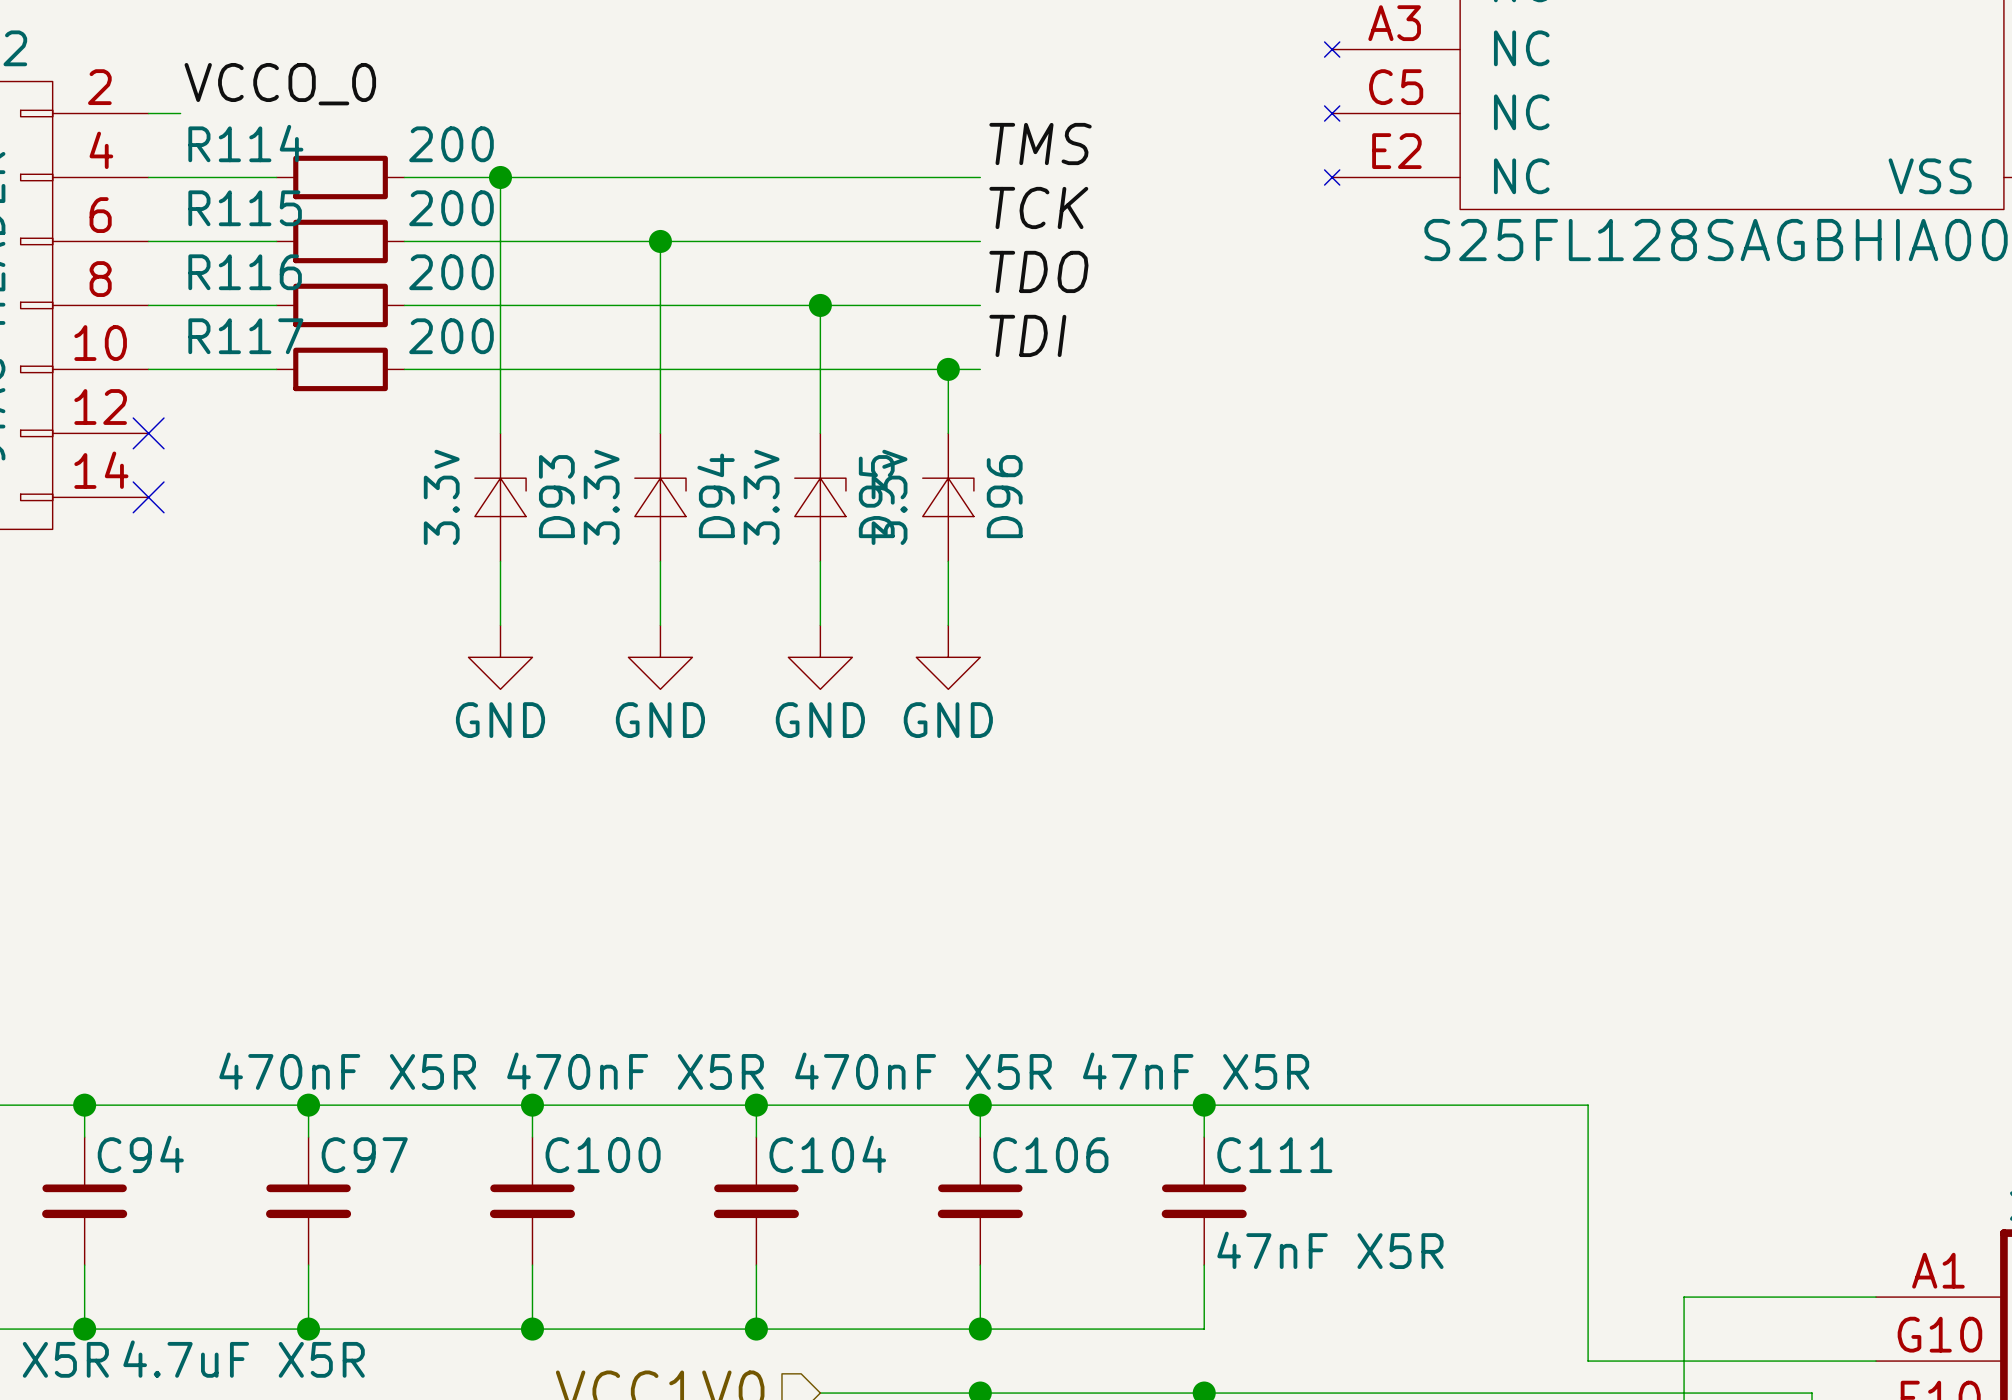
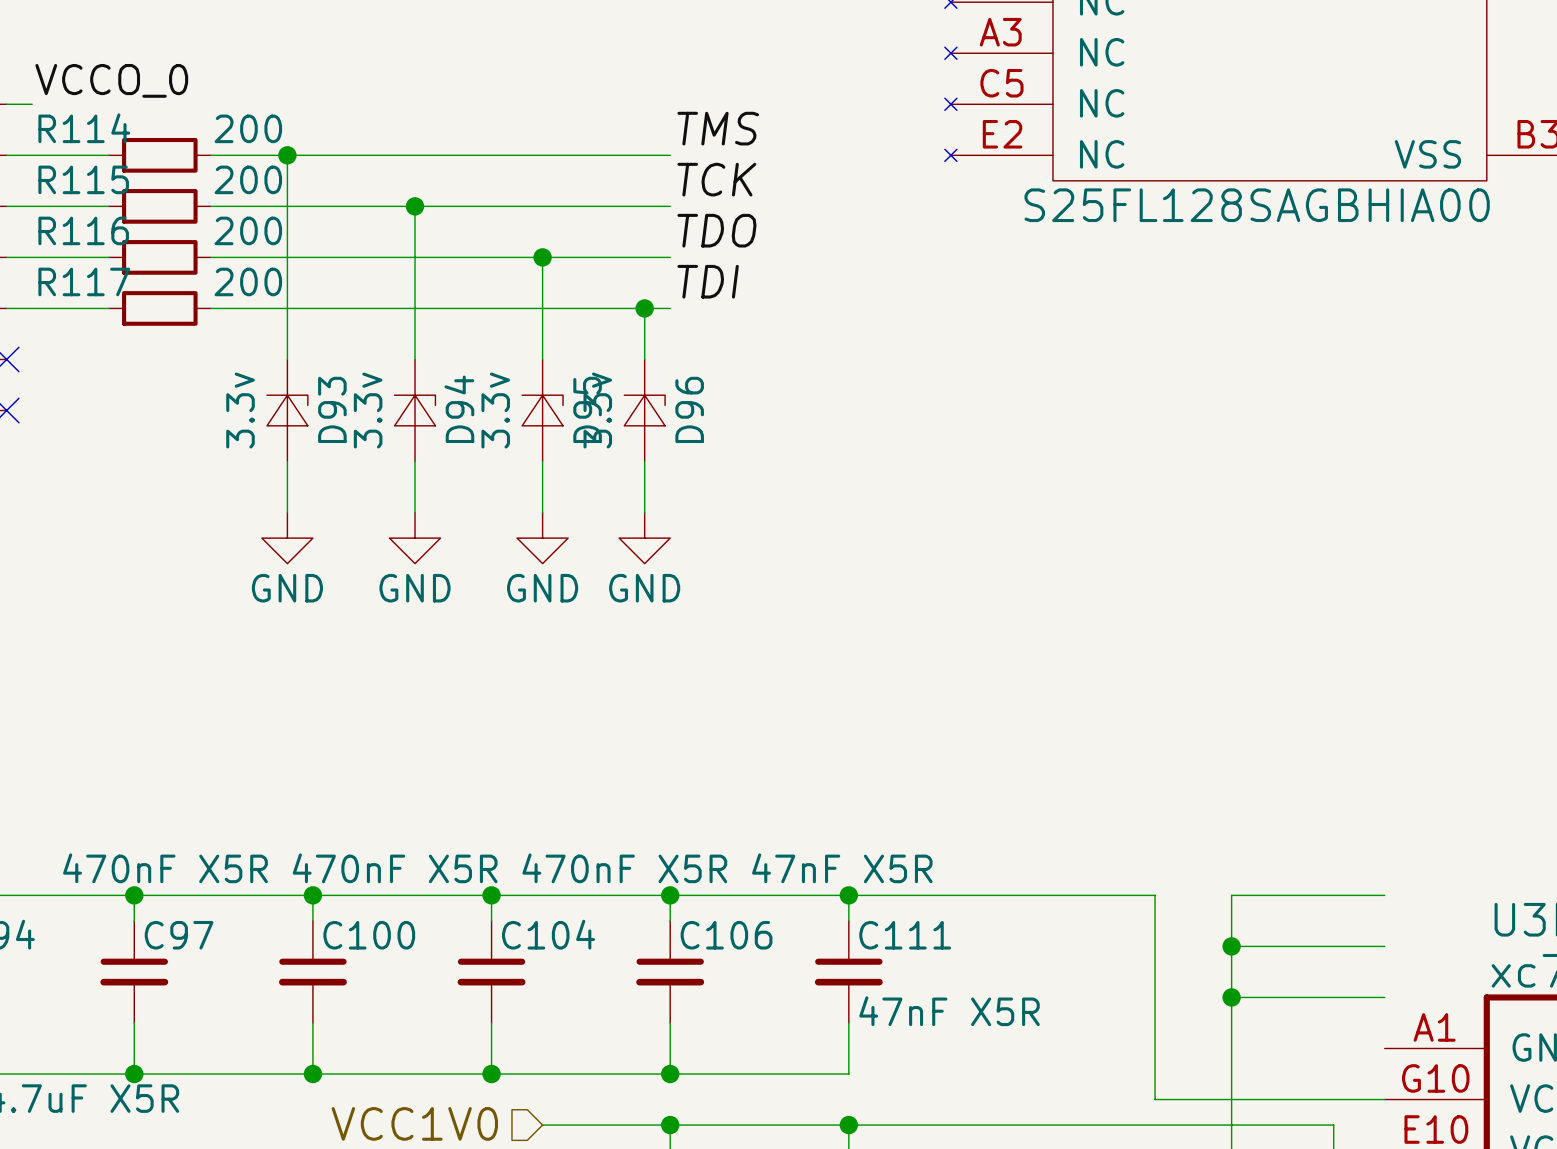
wire: none -> (1231, 946) (1384, 946)
junction: none -> (1231, 946)
wire: none -> (1231, 997) (1384, 997)
junction: none -> (1231, 997)
wire: (1684, 1297) (1875, 1297) -> (1231, 1048) (1231, 895) (1384, 895)

